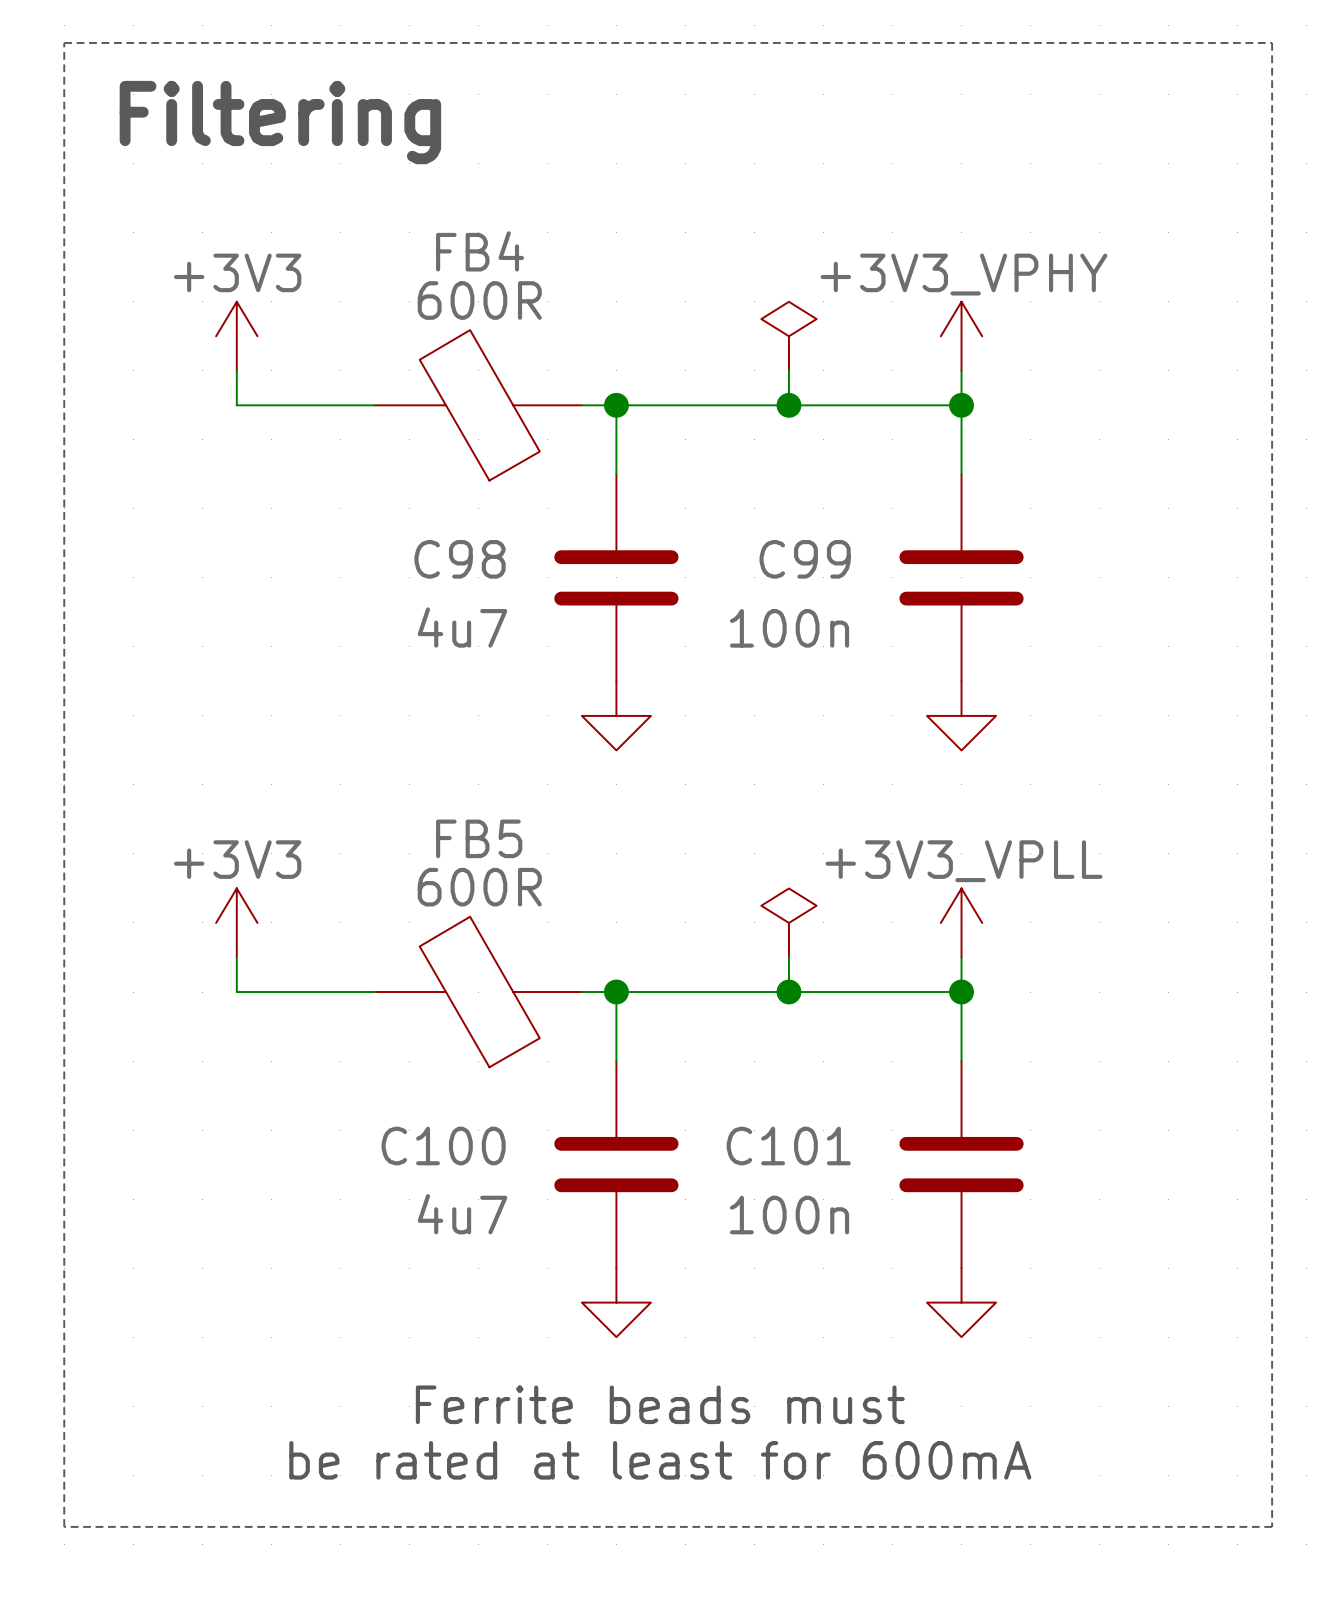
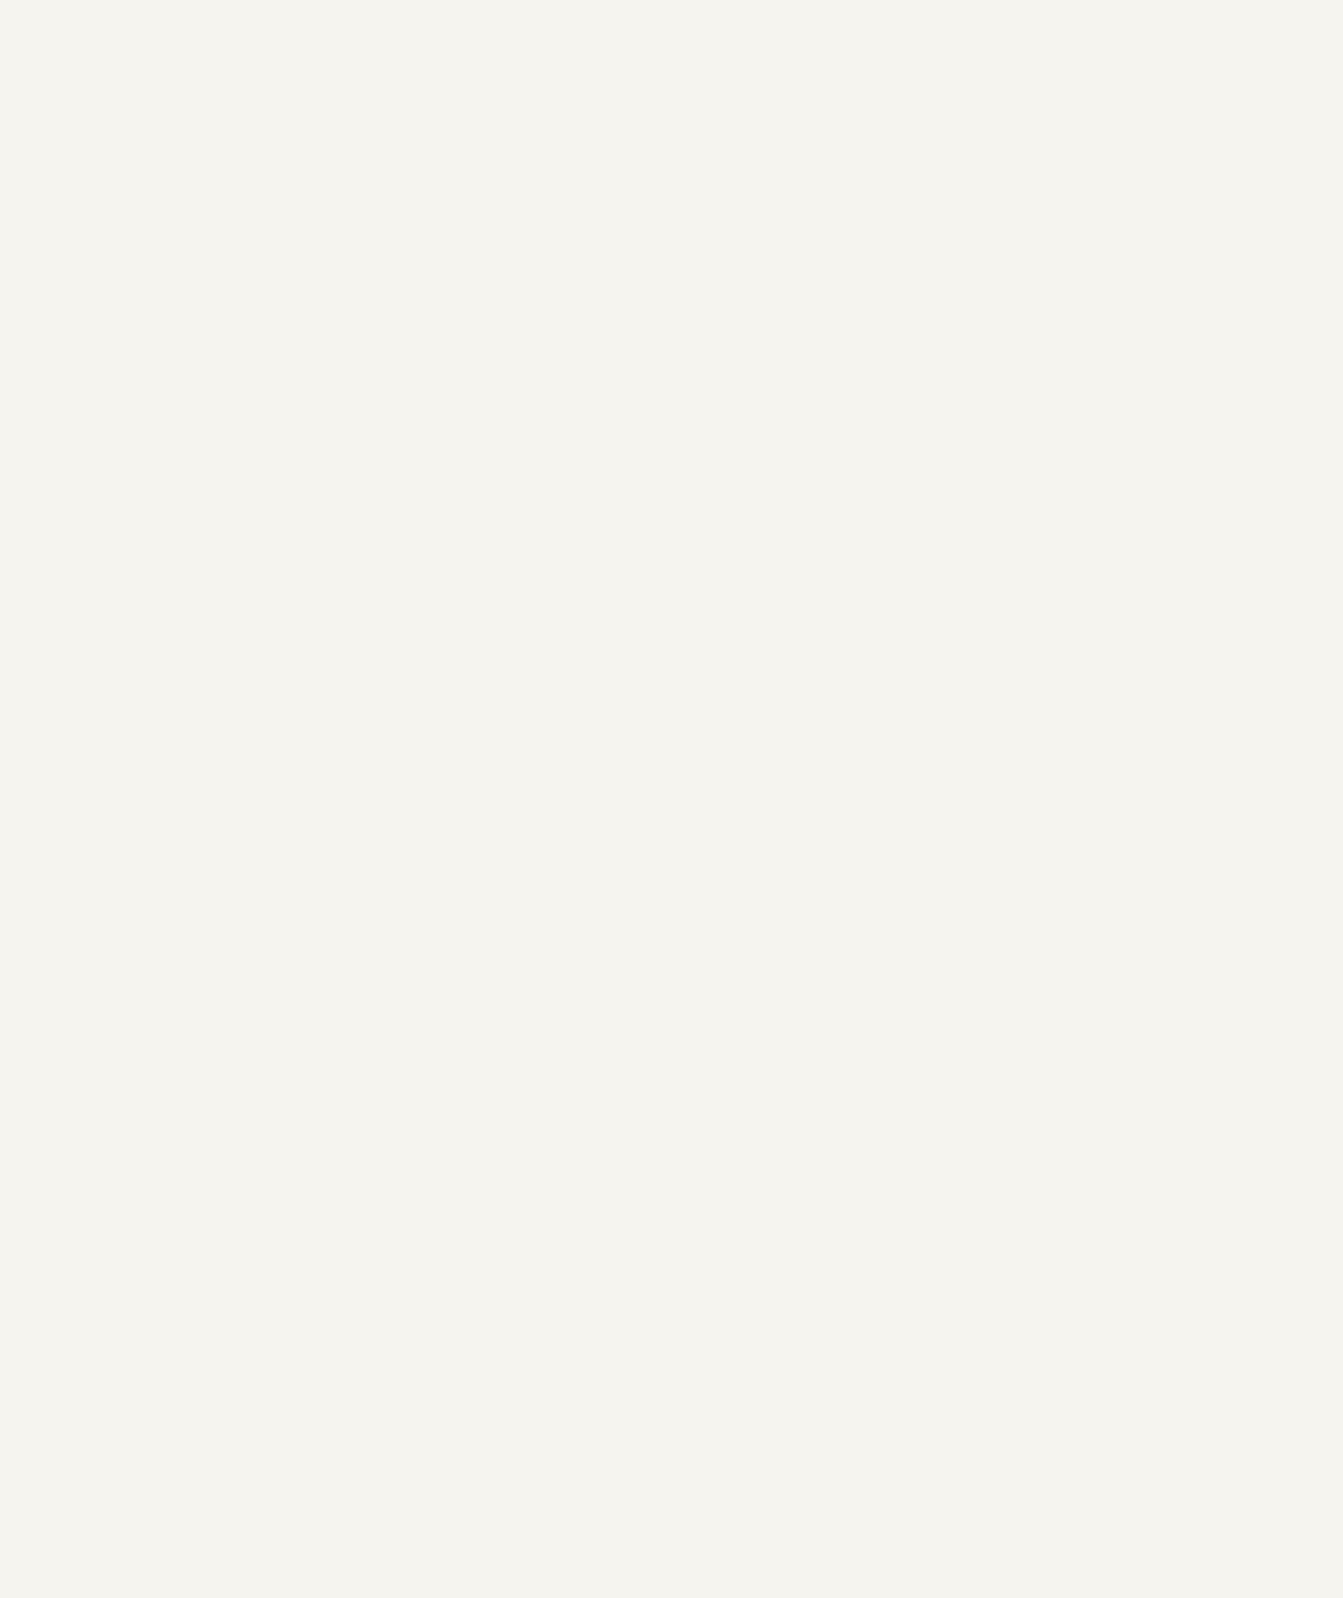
line: (64, 42) (1272, 42) (1272, 1526) (64, 1526) (64, 42) -> none
text: Filtering (280, 122) -> none
power symbol: +3V3 (236, 336) -> none
power symbol: (788, 336) -> none
power symbol: +3V3_VPHY (961, 336) -> none
wire: (236, 370) (236, 405) (374, 405) -> none
wire: (788, 370) (788, 405) -> none
wire: (961, 370) (961, 474) -> none
FB4: 600R (478, 405) -> none
wire: (581, 405) (961, 405) -> none
wire: (616, 405) (616, 474) -> none
junction: (616, 405) -> none
junction: (788, 405) -> none
junction: (961, 405) -> none
C98: 4u7 (616, 577) -> none
C99: 100n (961, 577) -> none
power symbol: (616, 715) -> none
power symbol: (961, 715) -> none
power symbol: +3V3 (236, 922) -> none
power symbol: (788, 922) -> none
power symbol: +3V3_VPLL (961, 922) -> none
wire: (236, 957) (236, 992) (374, 992) -> none
wire: (788, 957) (788, 992) -> none
wire: (961, 957) (961, 1061) -> none
FB5: 600R (478, 992) -> none
wire: (581, 992) (961, 992) -> none
wire: (616, 992) (616, 1061) -> none
junction: (616, 992) -> none
junction: (788, 992) -> none
junction: (961, 992) -> none
C100: 4u7 (616, 1164) -> none
C101: 100n (961, 1164) -> none
power symbol: (616, 1302) -> none
power symbol: (961, 1302) -> none
text: Ferrite beads must (660, 1404) -> none
text: be rated at least for 600mA (660, 1460) -> none

